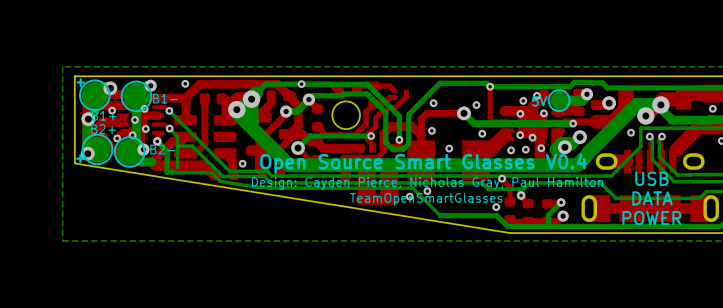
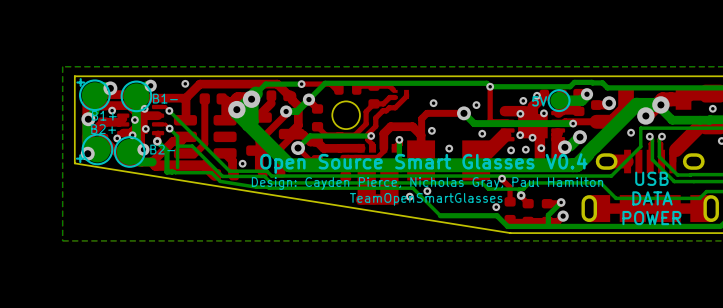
bottom track: (439, 83) (408, 114) (408, 143) (403, 149) (392, 149) (385, 142) (385, 112) (367, 93) (312, 95) -> (439, 83) (325, 83) (312, 95)
bottom track: (301, 84) (367, 84) (369, 87) -> none
bottom track: (370, 87) (399, 116) (399, 139) -> (400, 165) (399, 139)
bottom track: (568, 144) (562, 144) (556, 149) -> none

